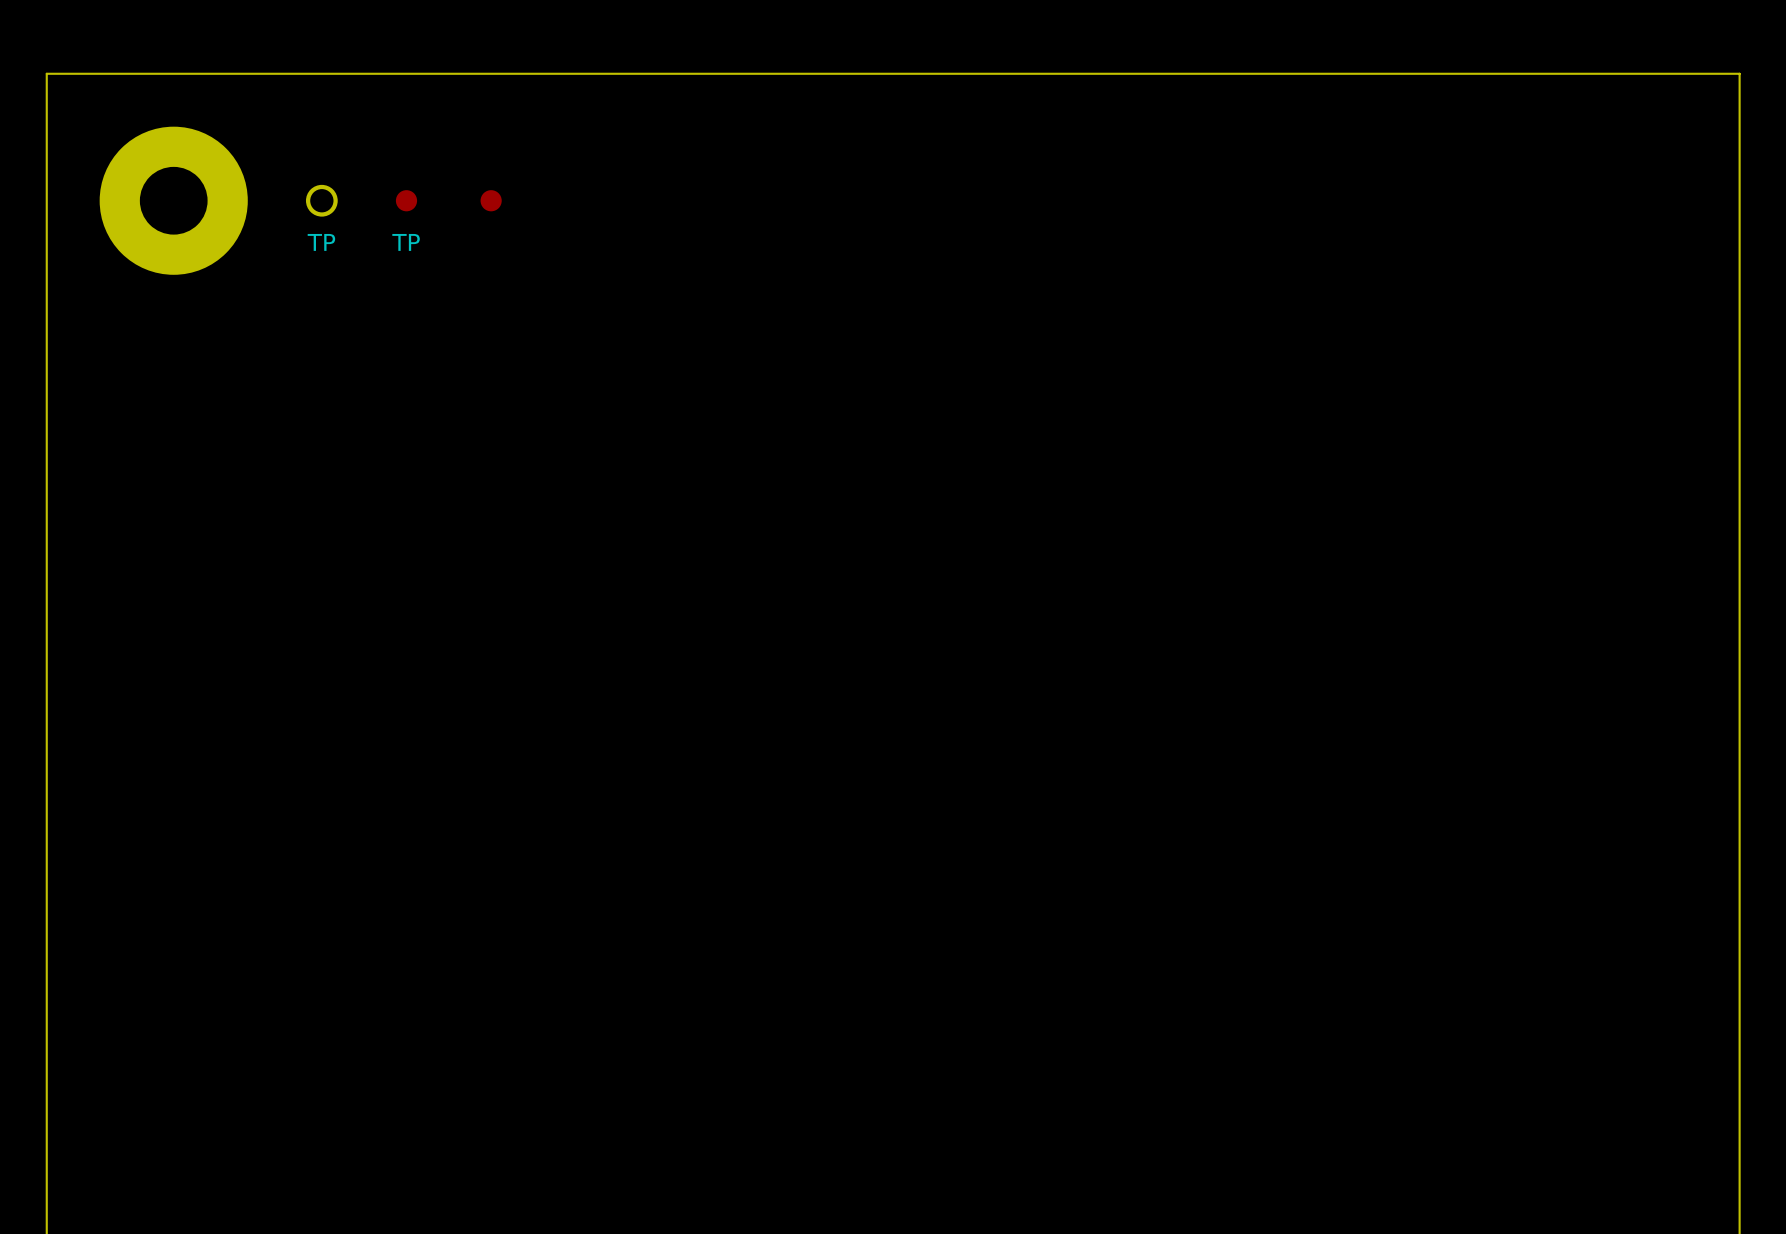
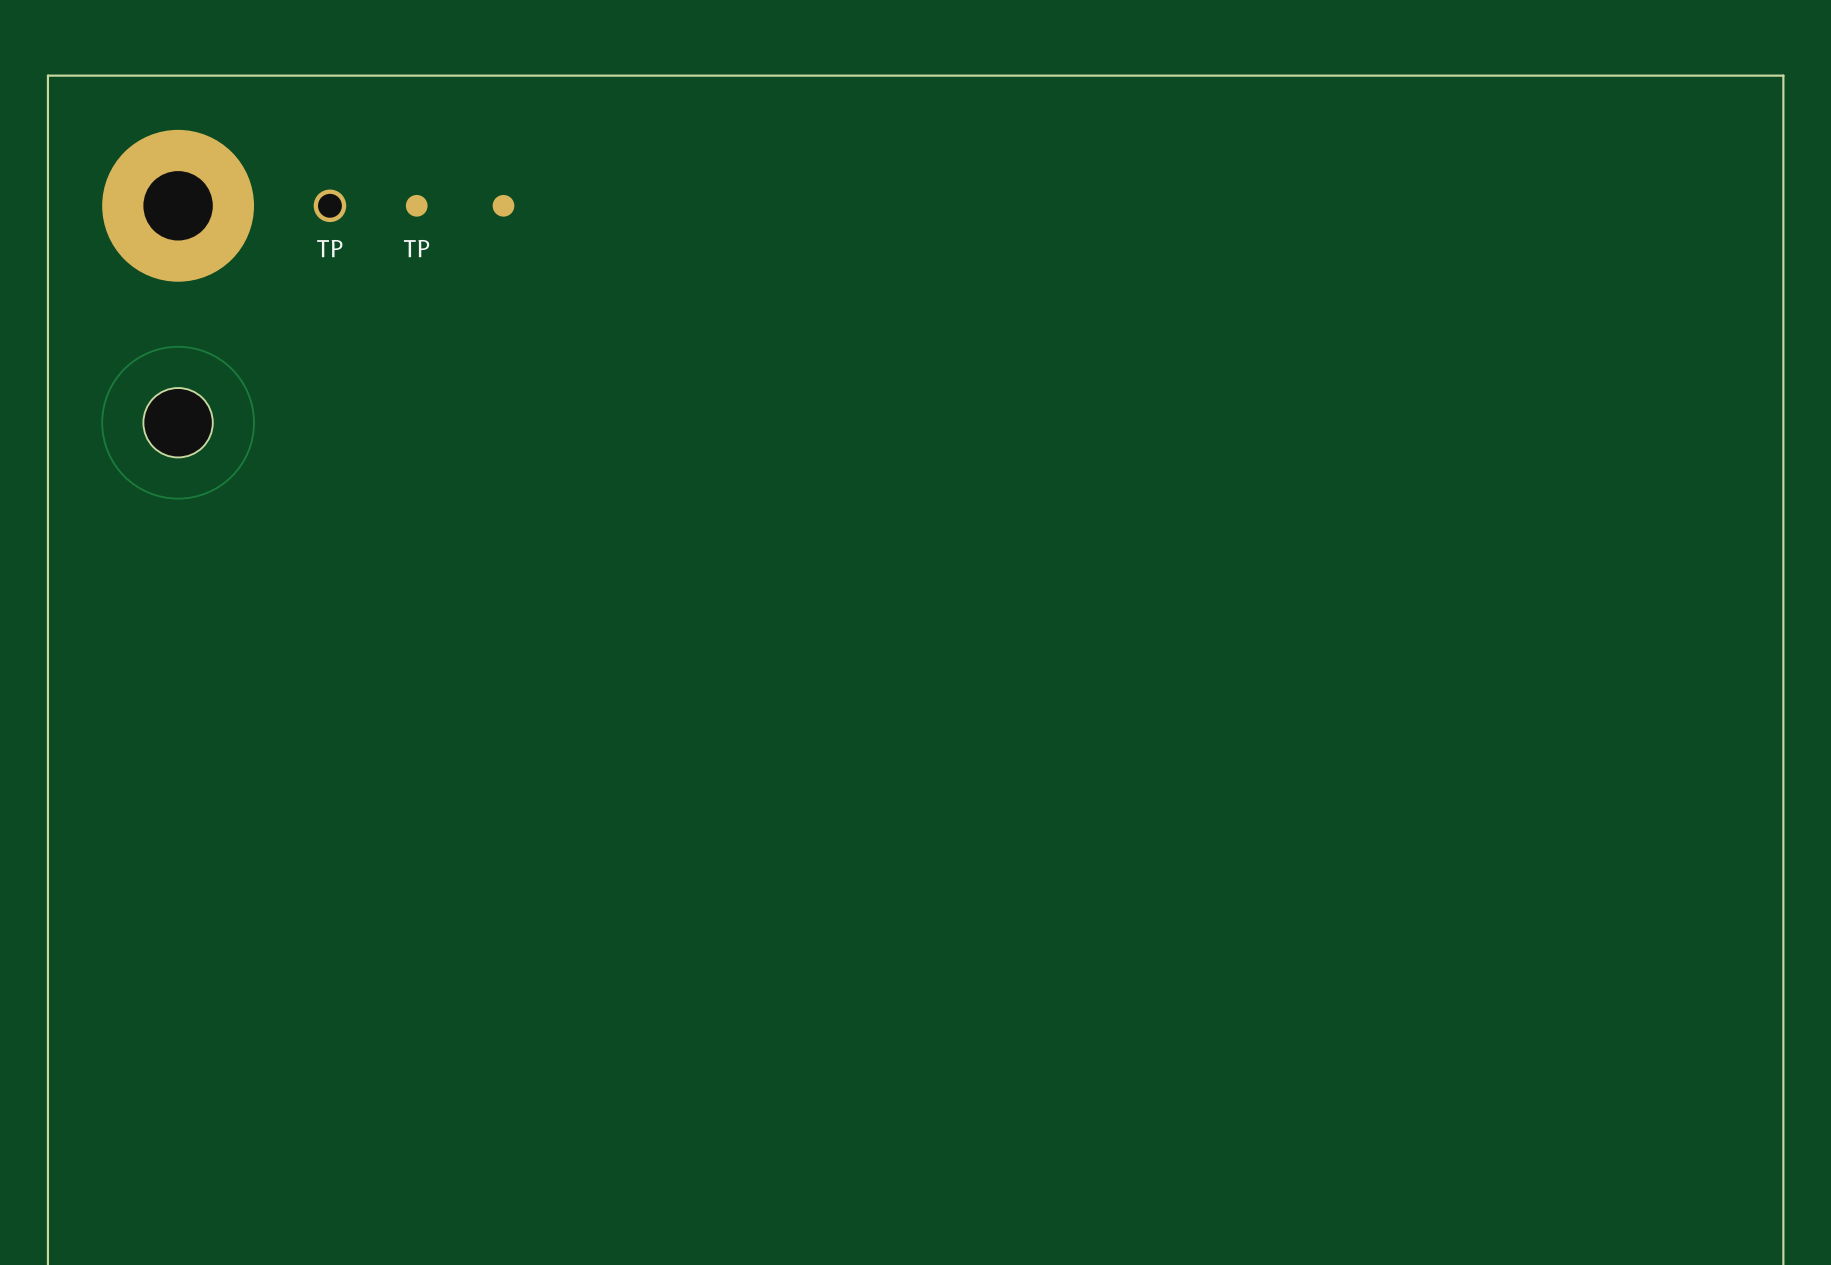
part: none -> (178, 422)

